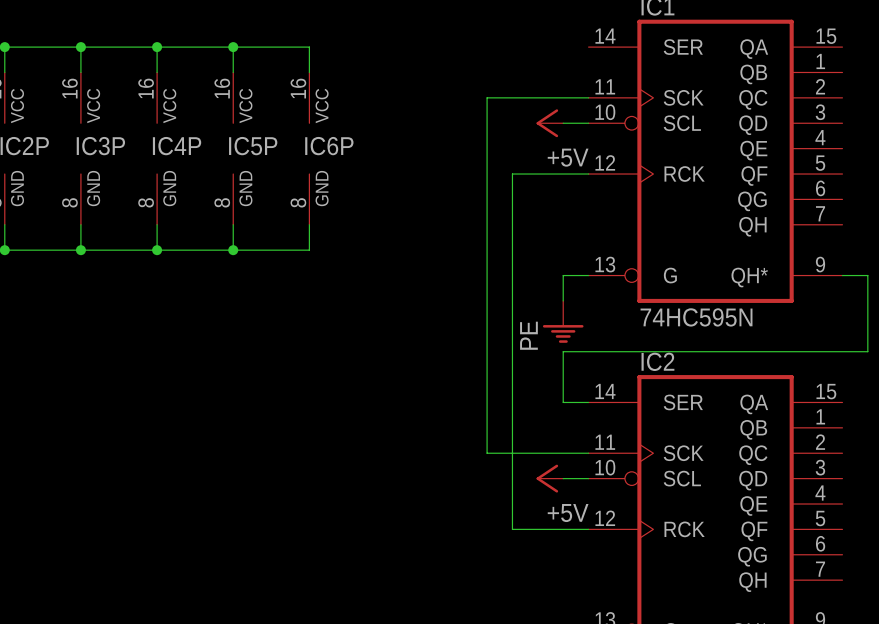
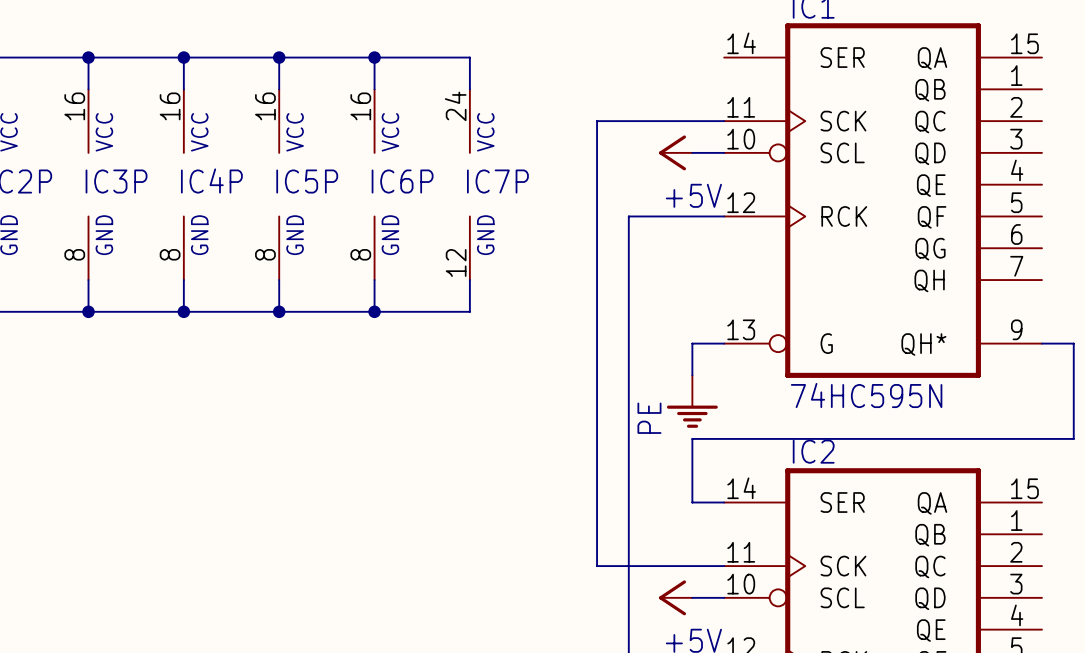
wire: none -> (374, 57) (469, 57) (469, 89)
junction: none -> (374, 57)
IC7P: none -> (469, 184)
wire: none -> (469, 280) (469, 311) (374, 311)
junction: none -> (374, 311)

